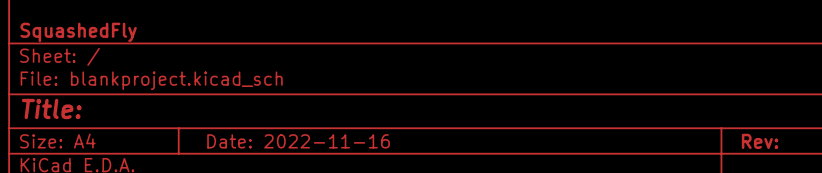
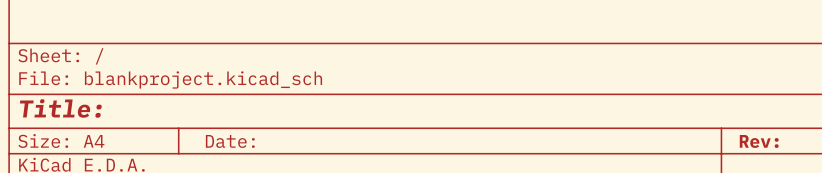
title block: SquashedFly (78, 32) -> none
title block: Date: 2022-11-16 (298, 141) -> Date: (230, 141)

